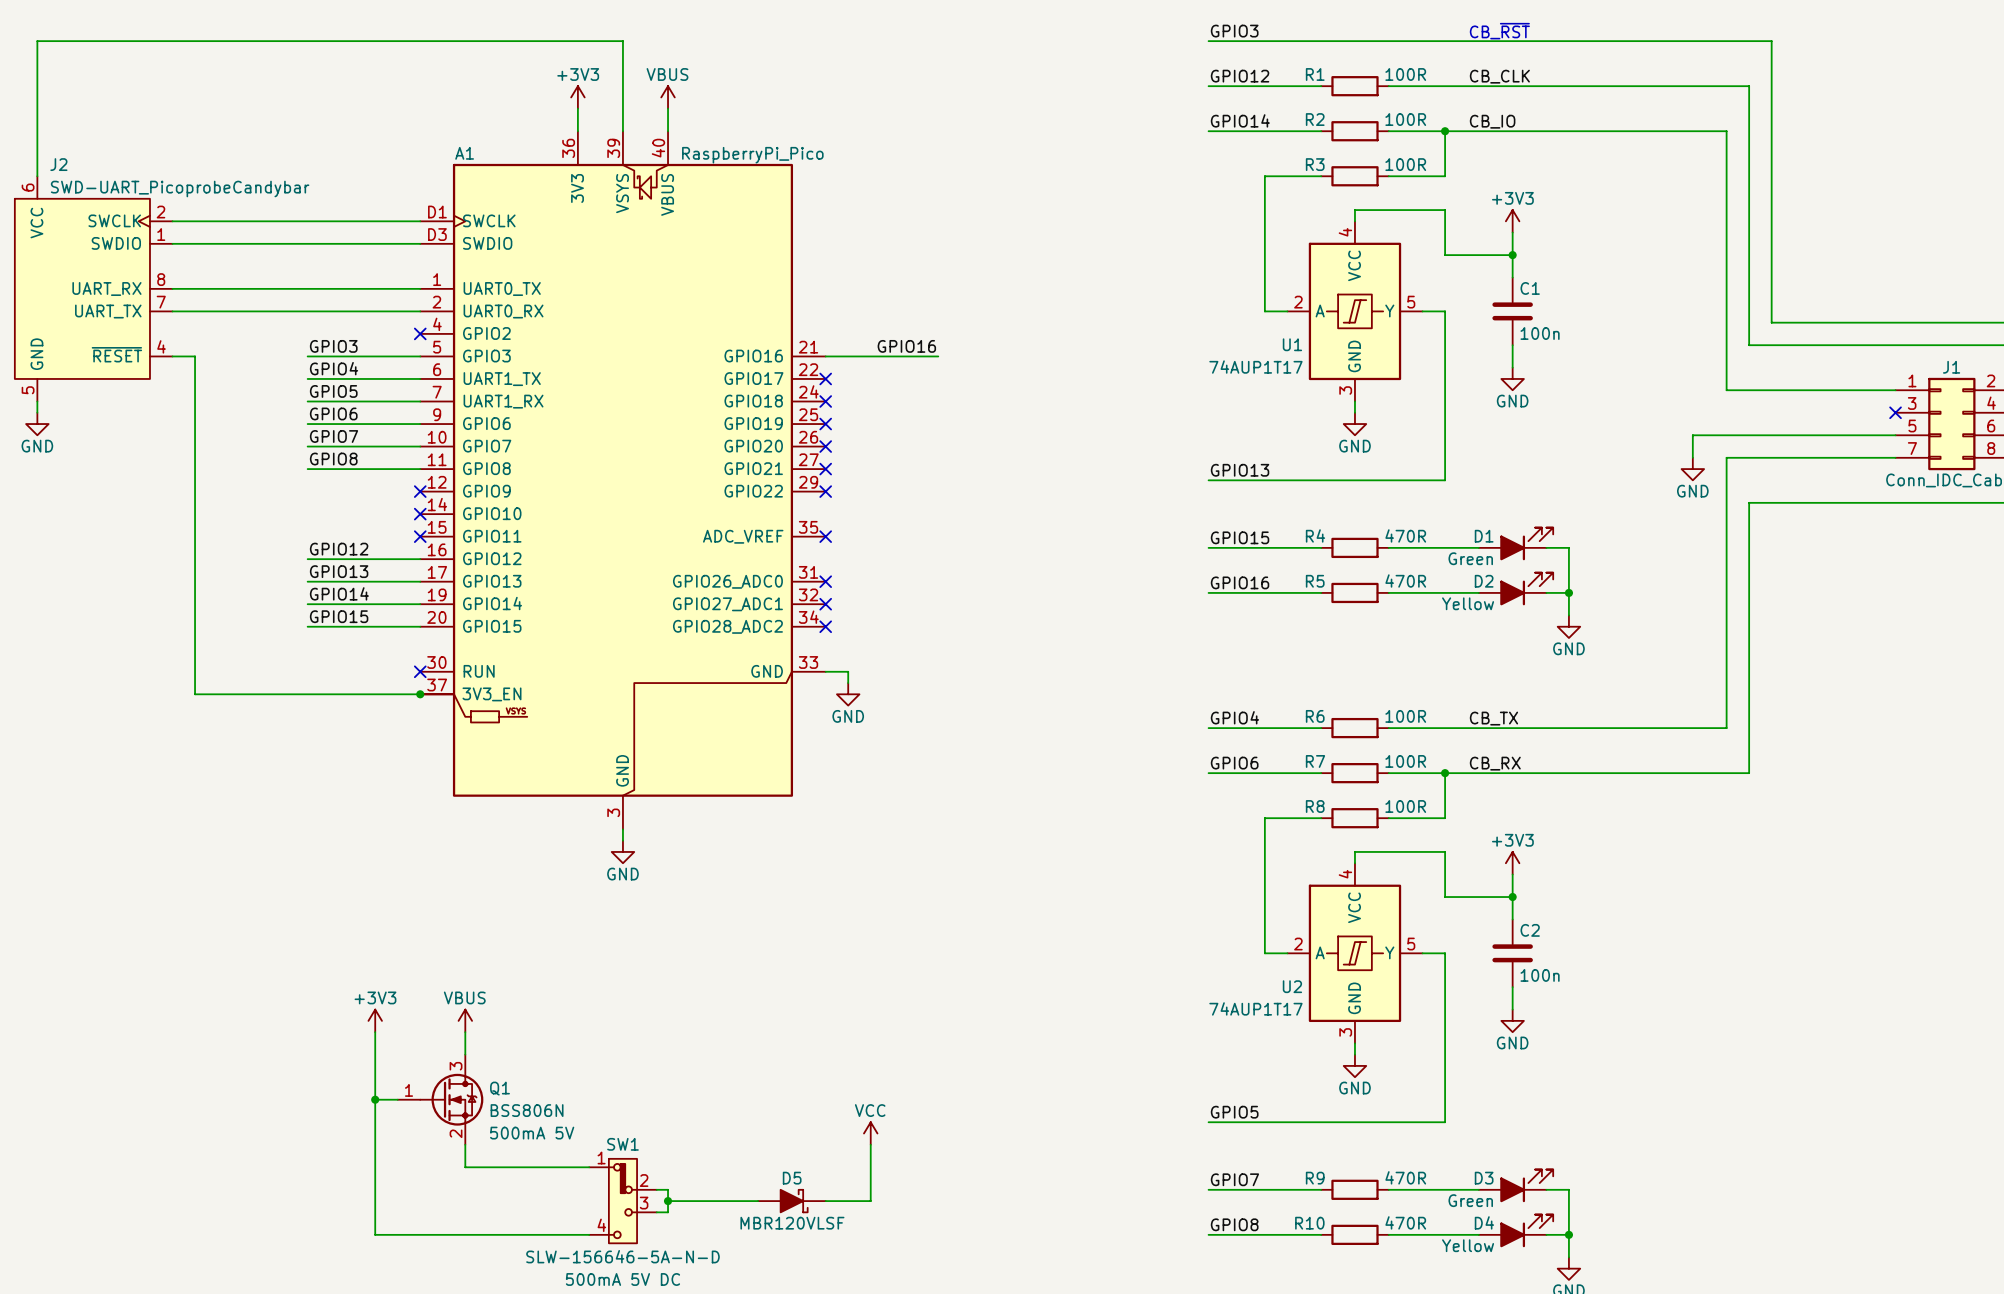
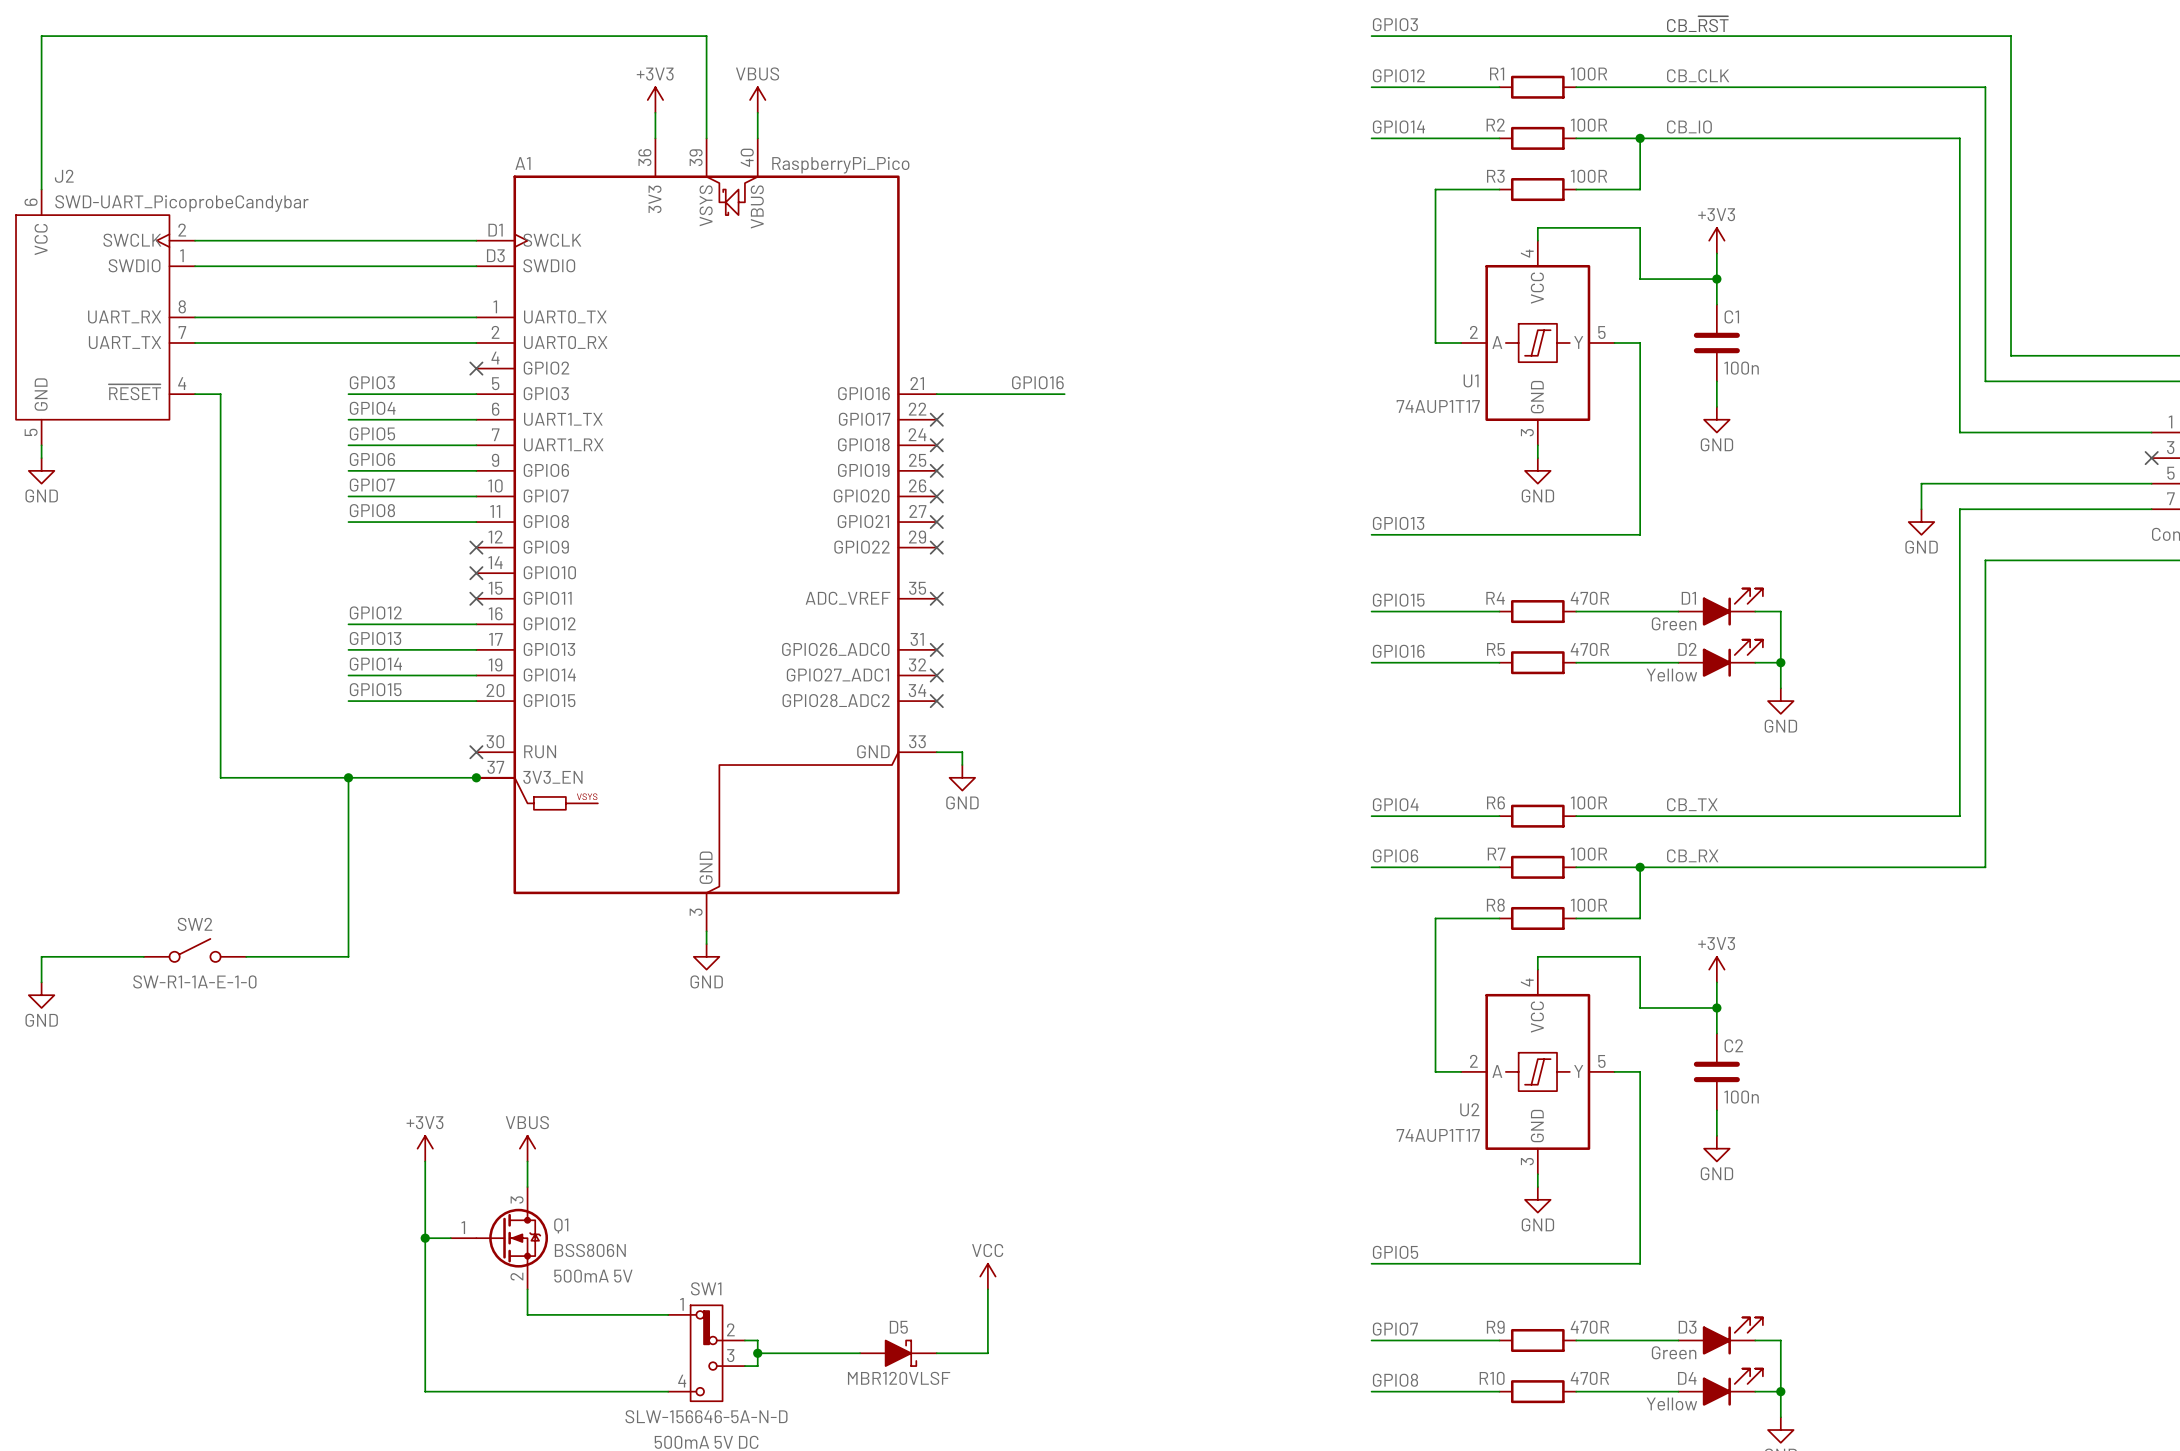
wire: none -> (348, 777) (348, 956) (246, 956)
junction: none -> (348, 777)
SW2: none -> SW-R1-1A-E-1-0 (195, 950)
wire: none -> (143, 956) (41, 956) (41, 982)
power symbol: none -> GND (41, 995)

